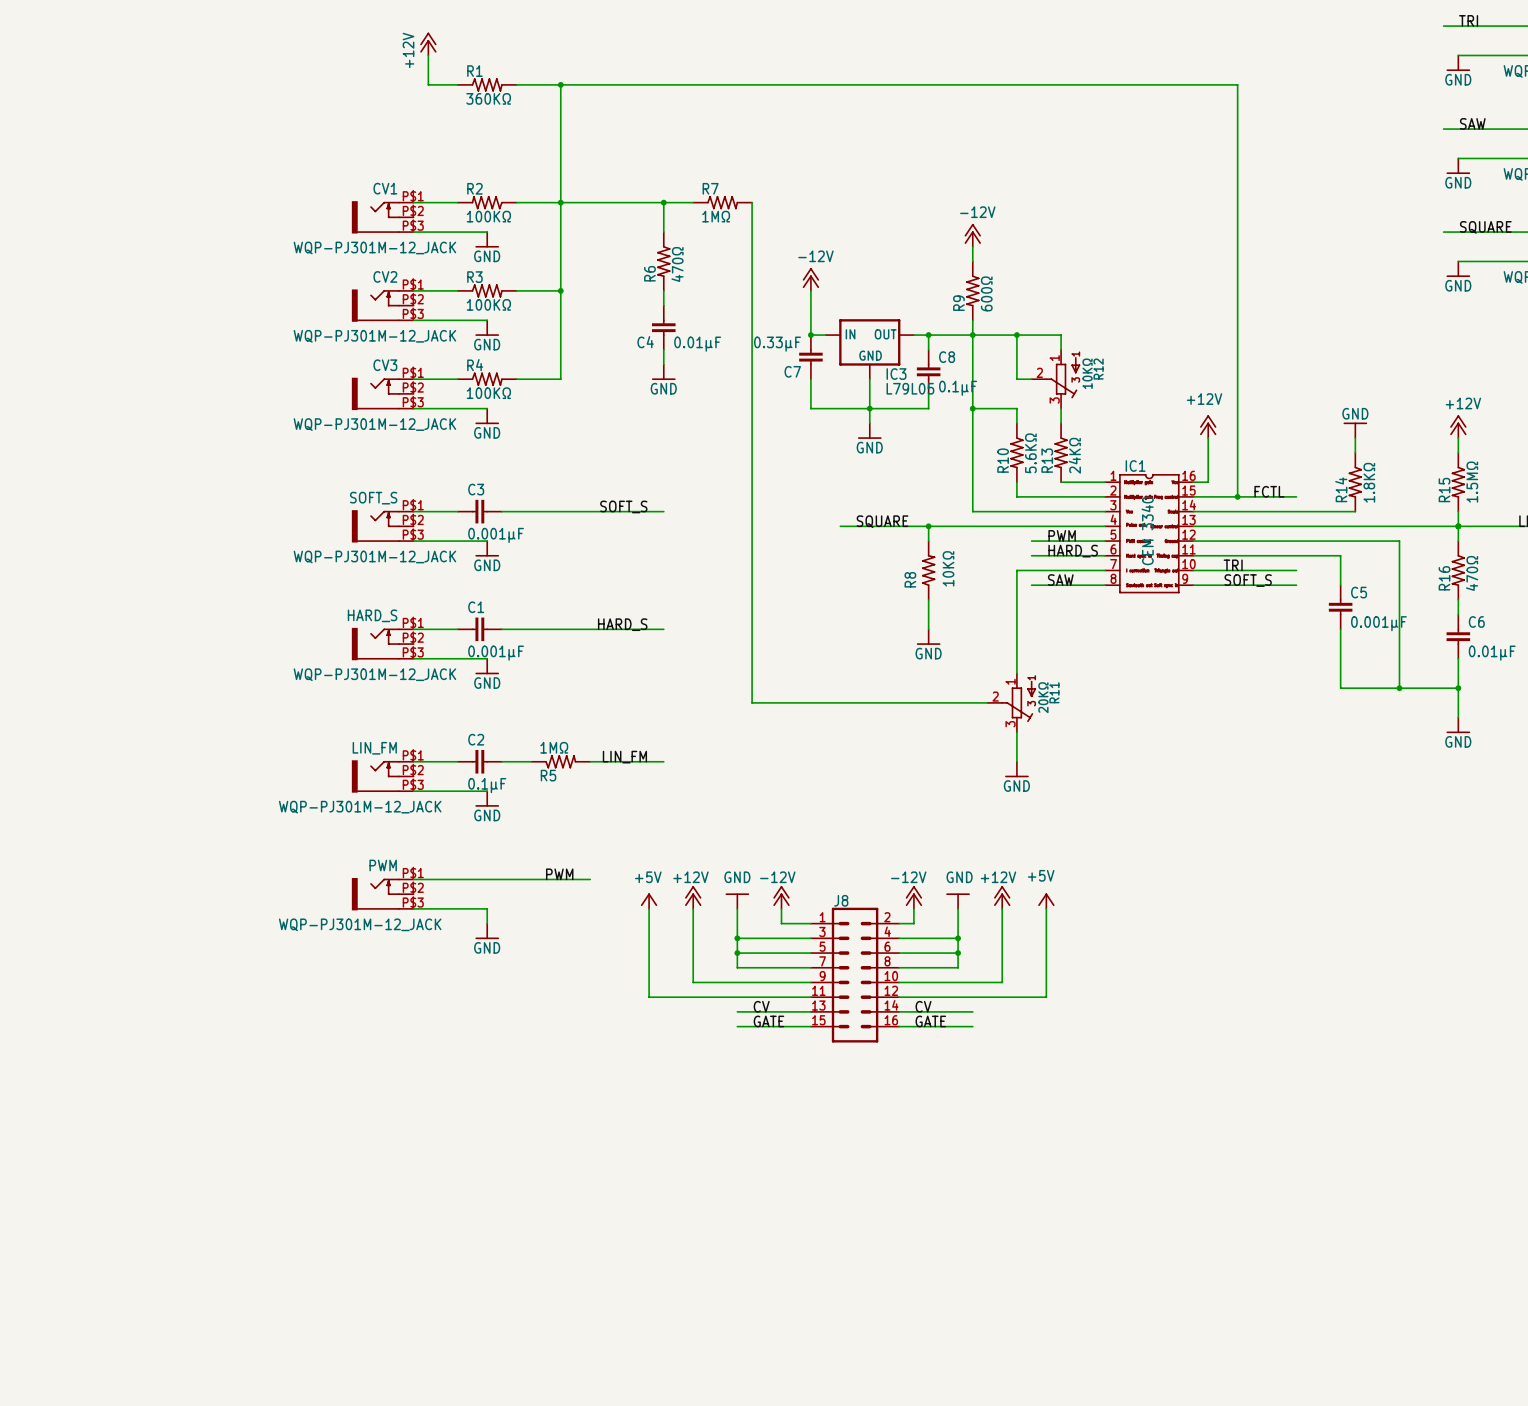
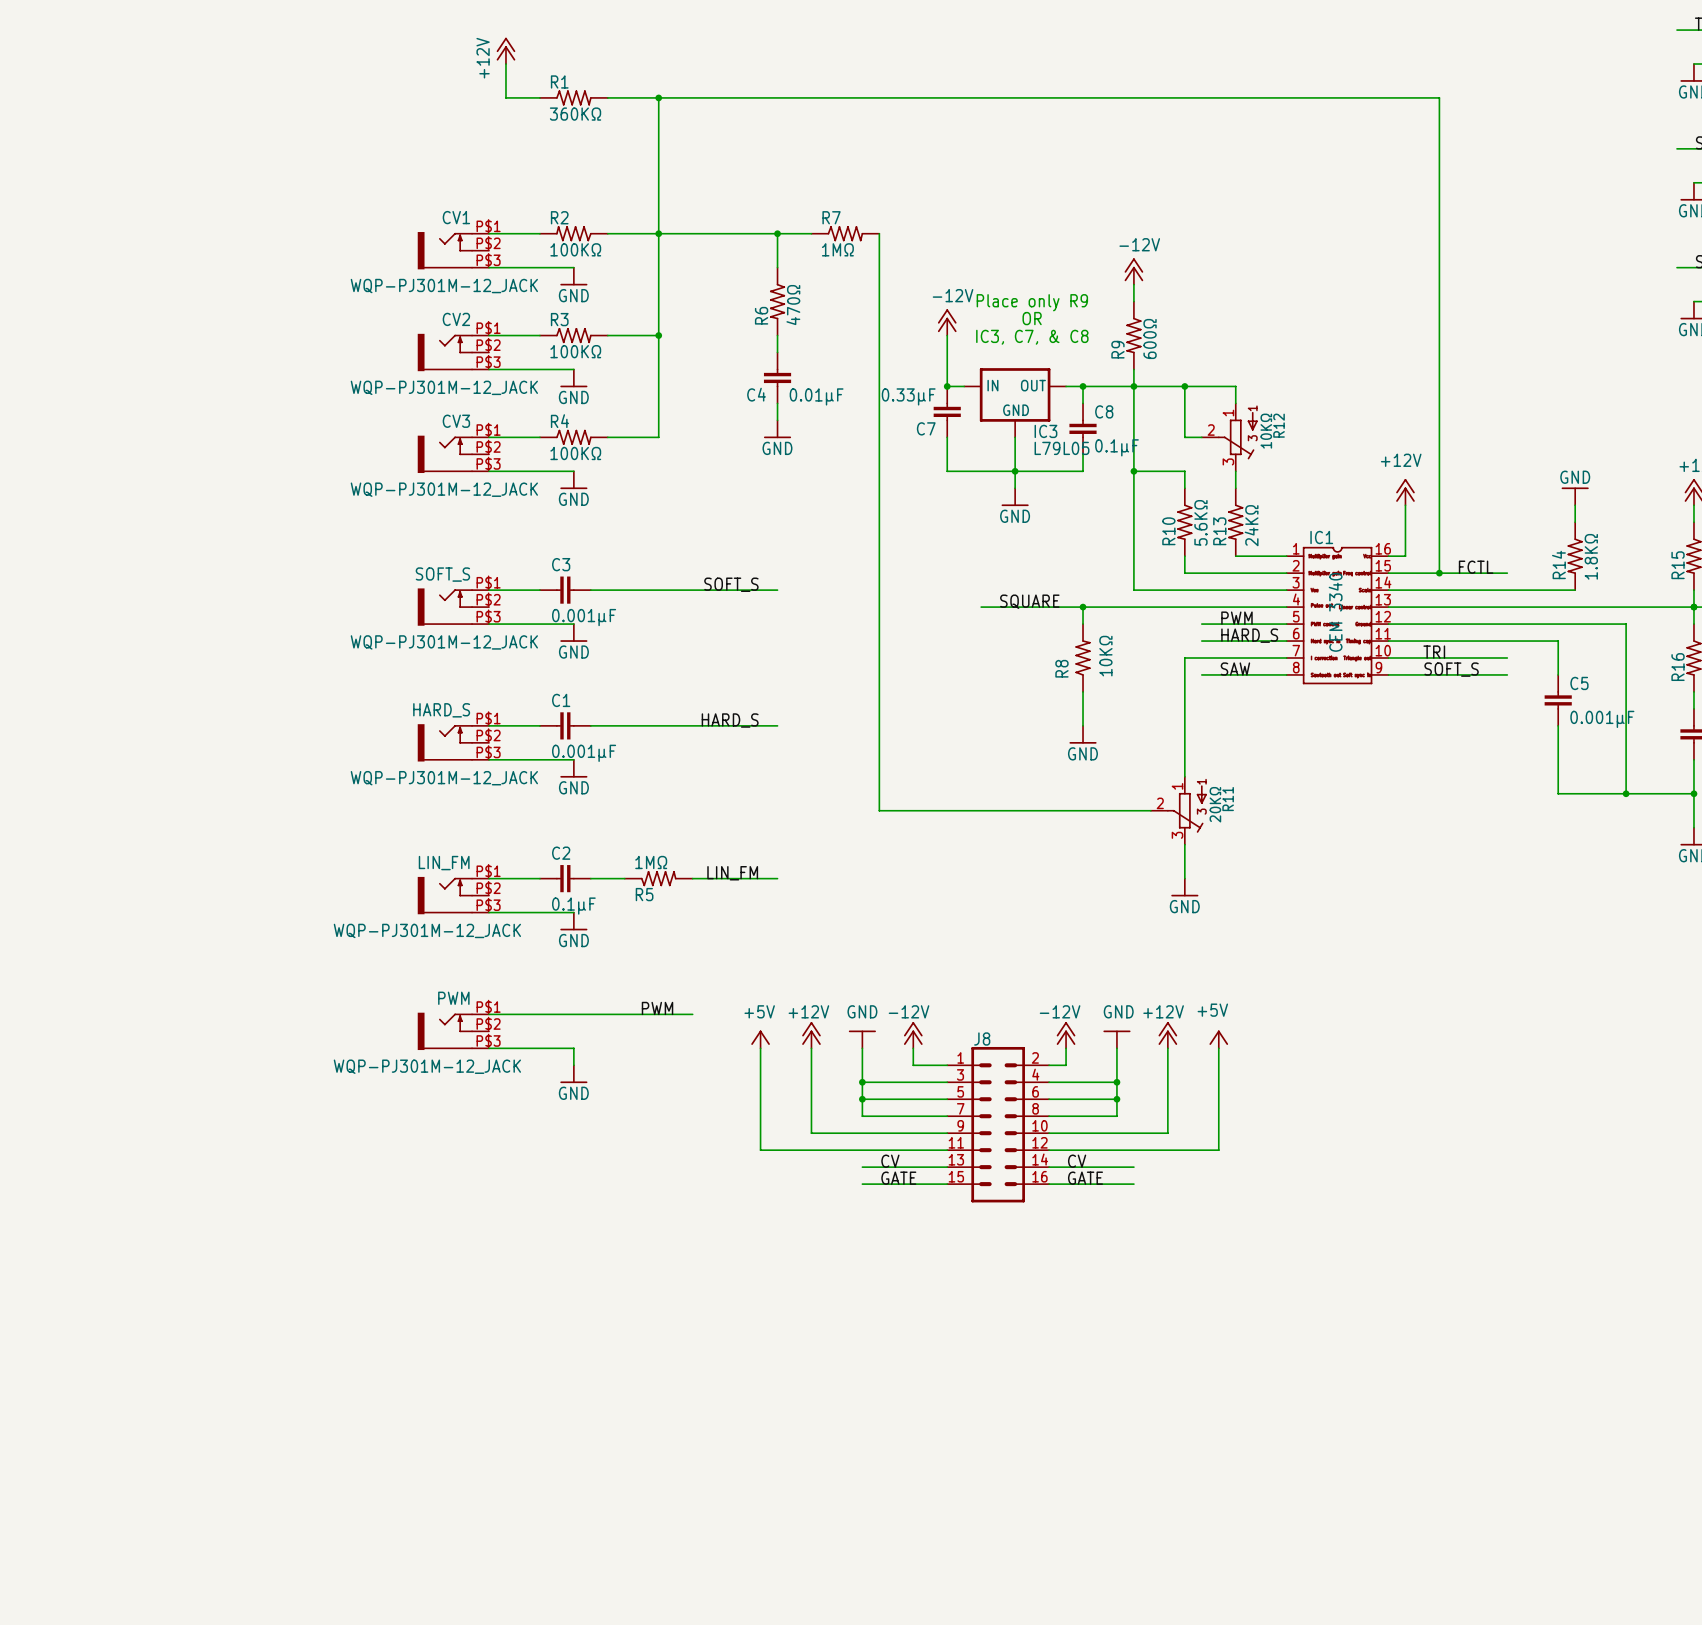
text: none -> Place only R9 (1032, 302)
text: none -> OR (1032, 318)
text: none -> IC3, C7, & C8 (1032, 337)

